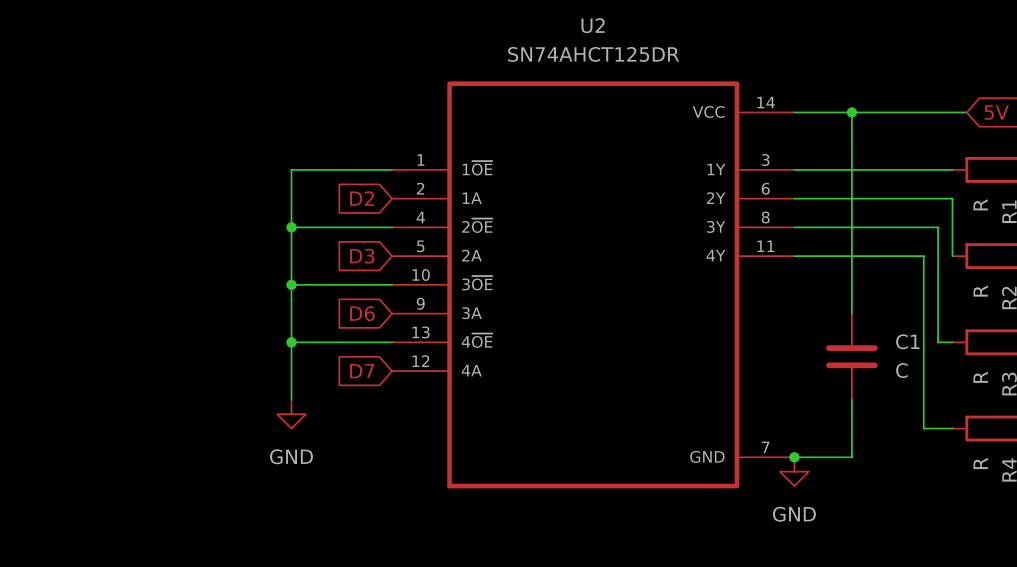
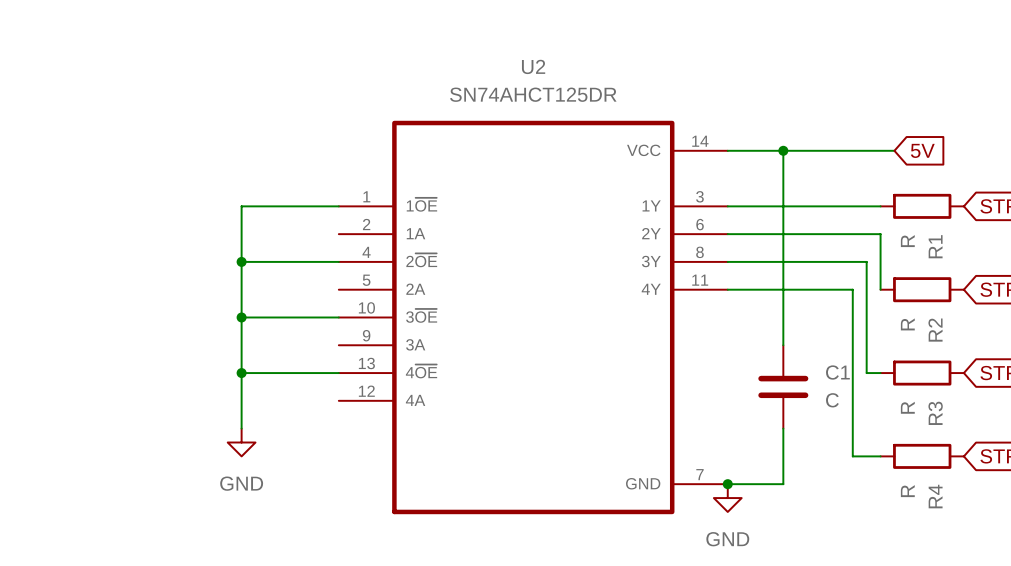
global label: D2 (362, 198) -> none
global label: D3 (362, 256) -> none
global label: D6 (362, 313) -> none
global label: D7 (362, 371) -> none

